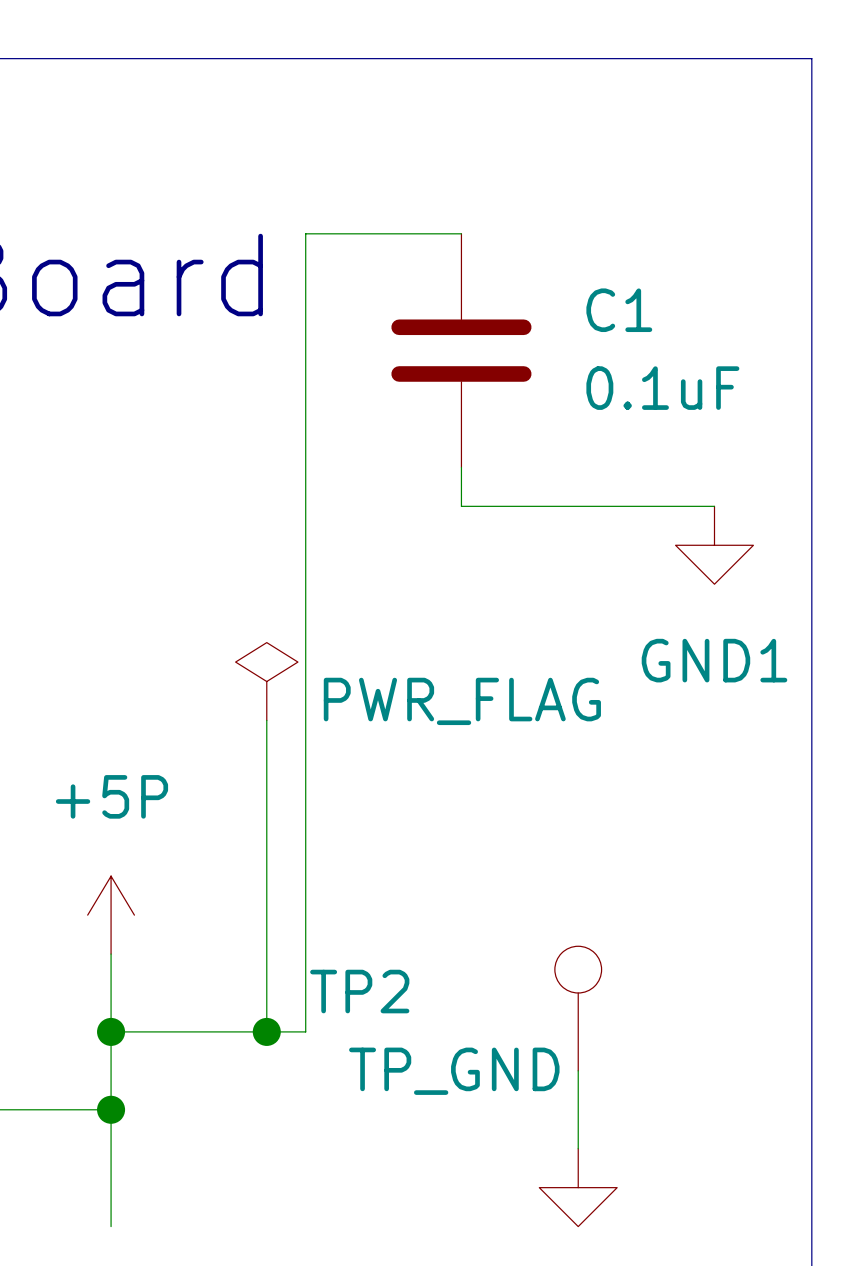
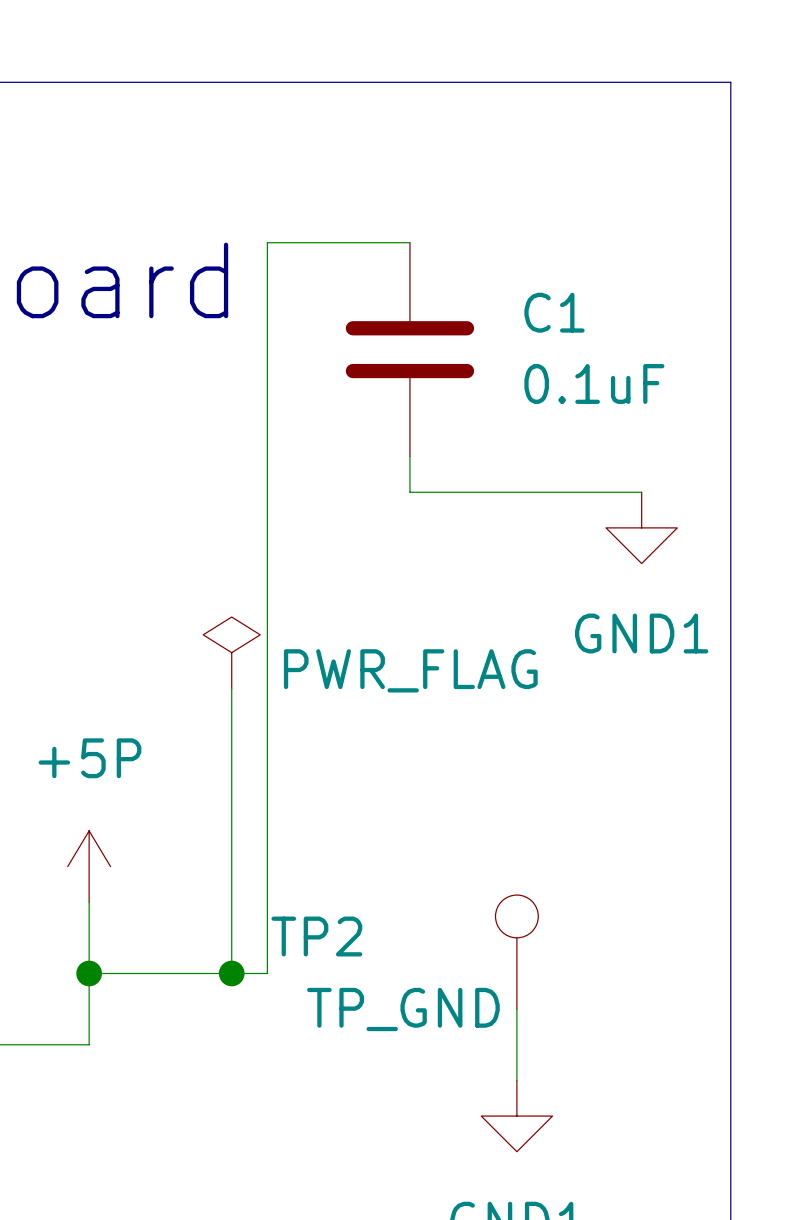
wire: (111, 1109) (111, 1226) -> none
junction: (111, 1109) -> none

